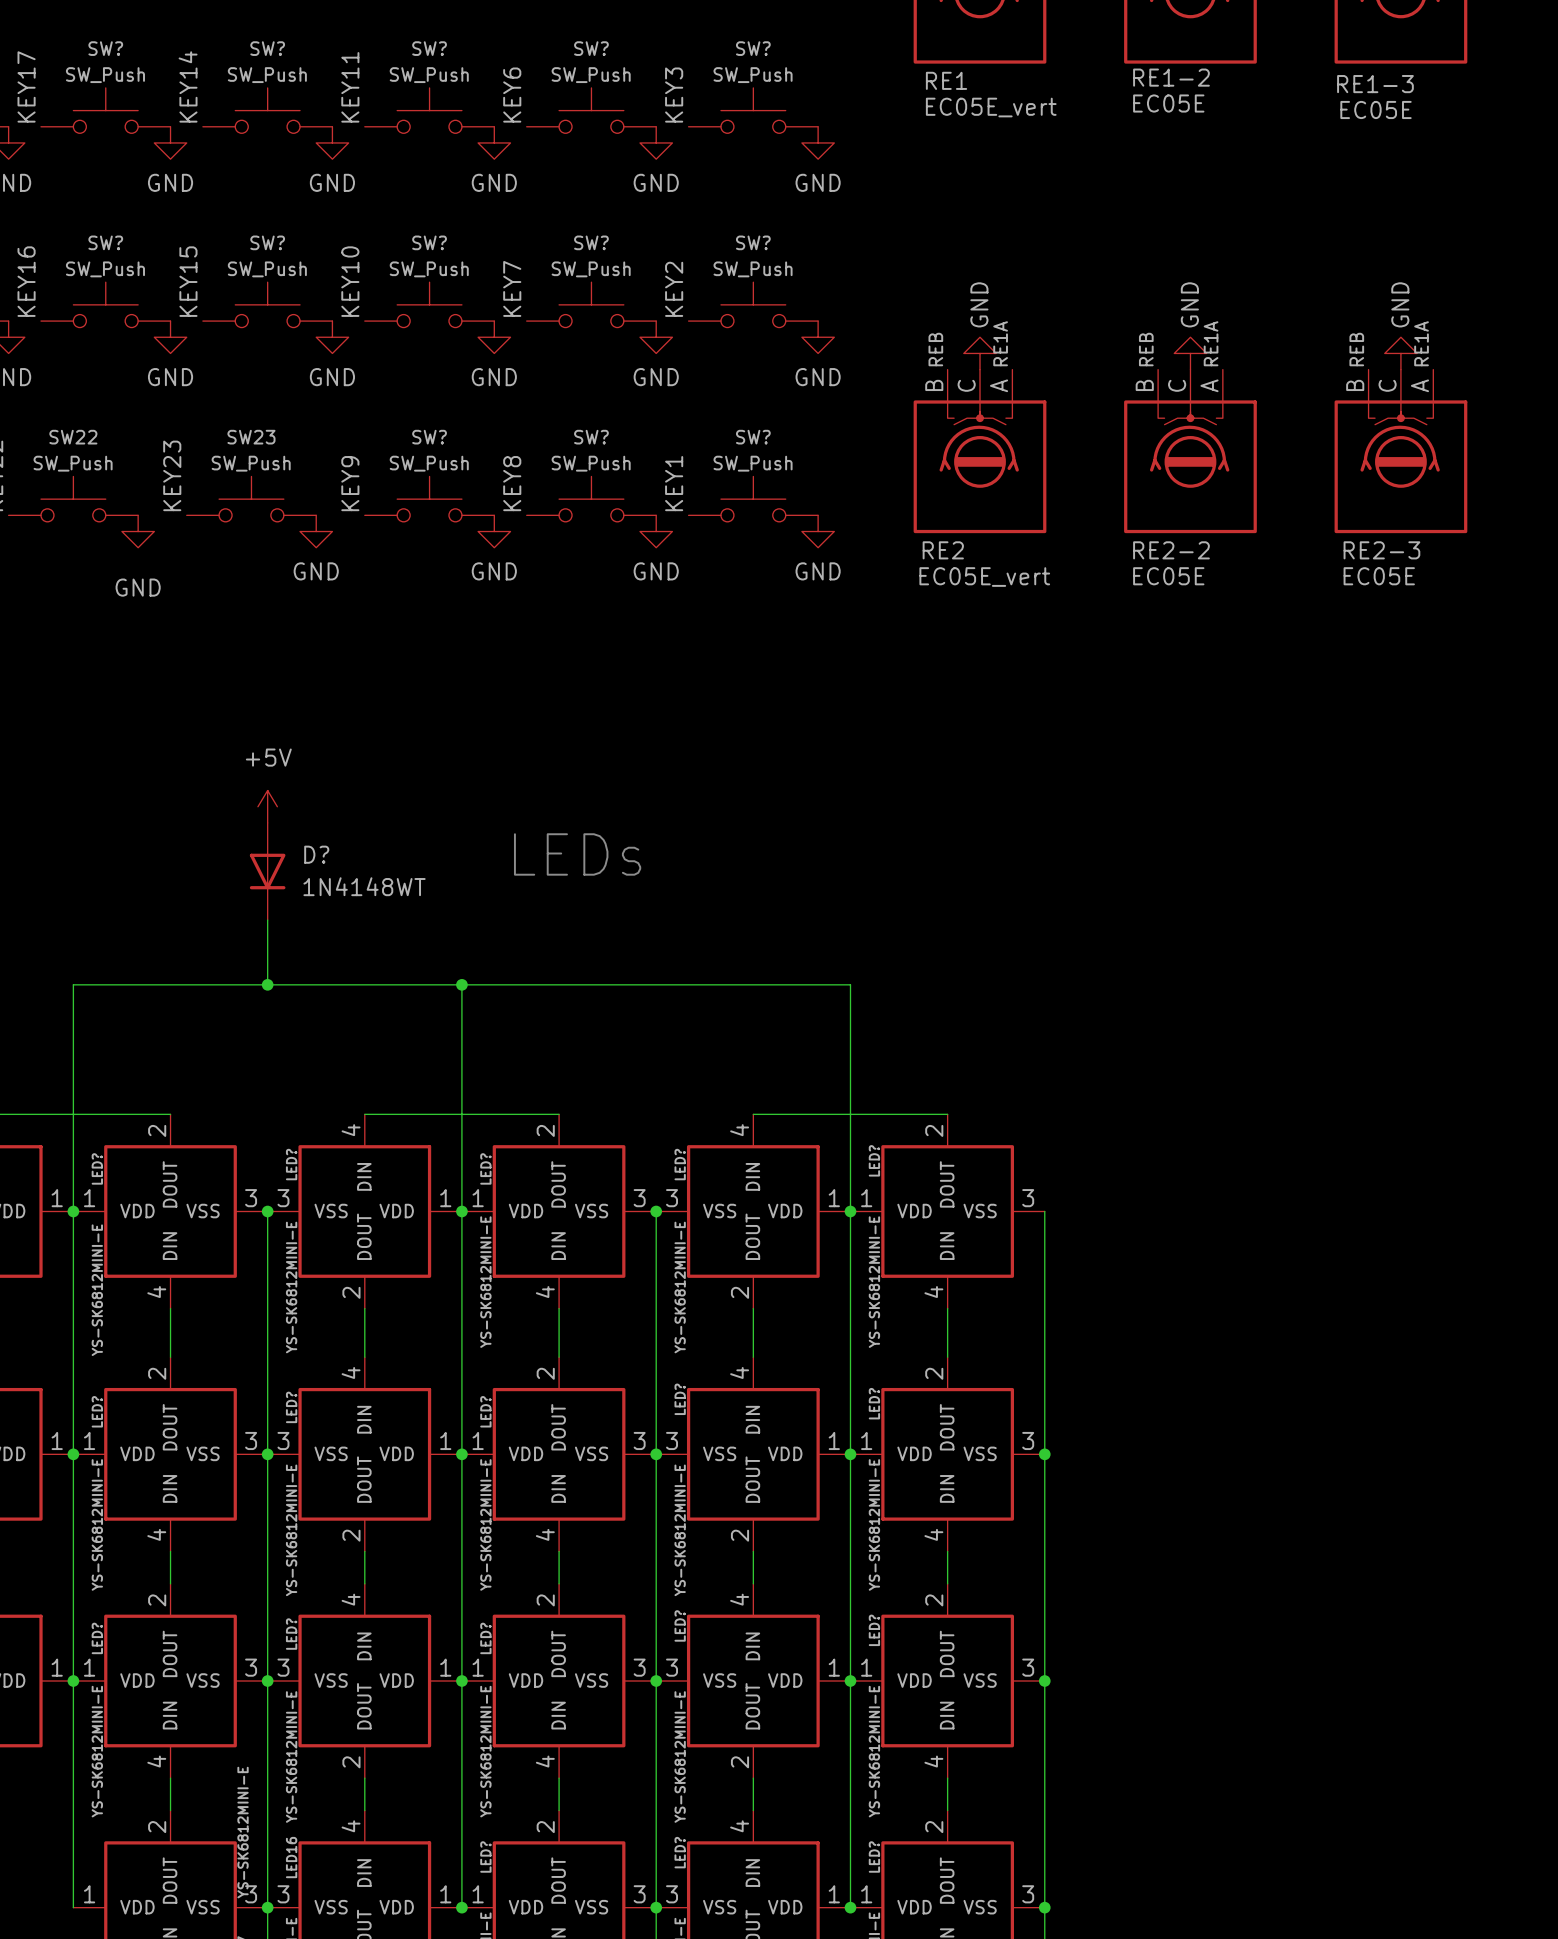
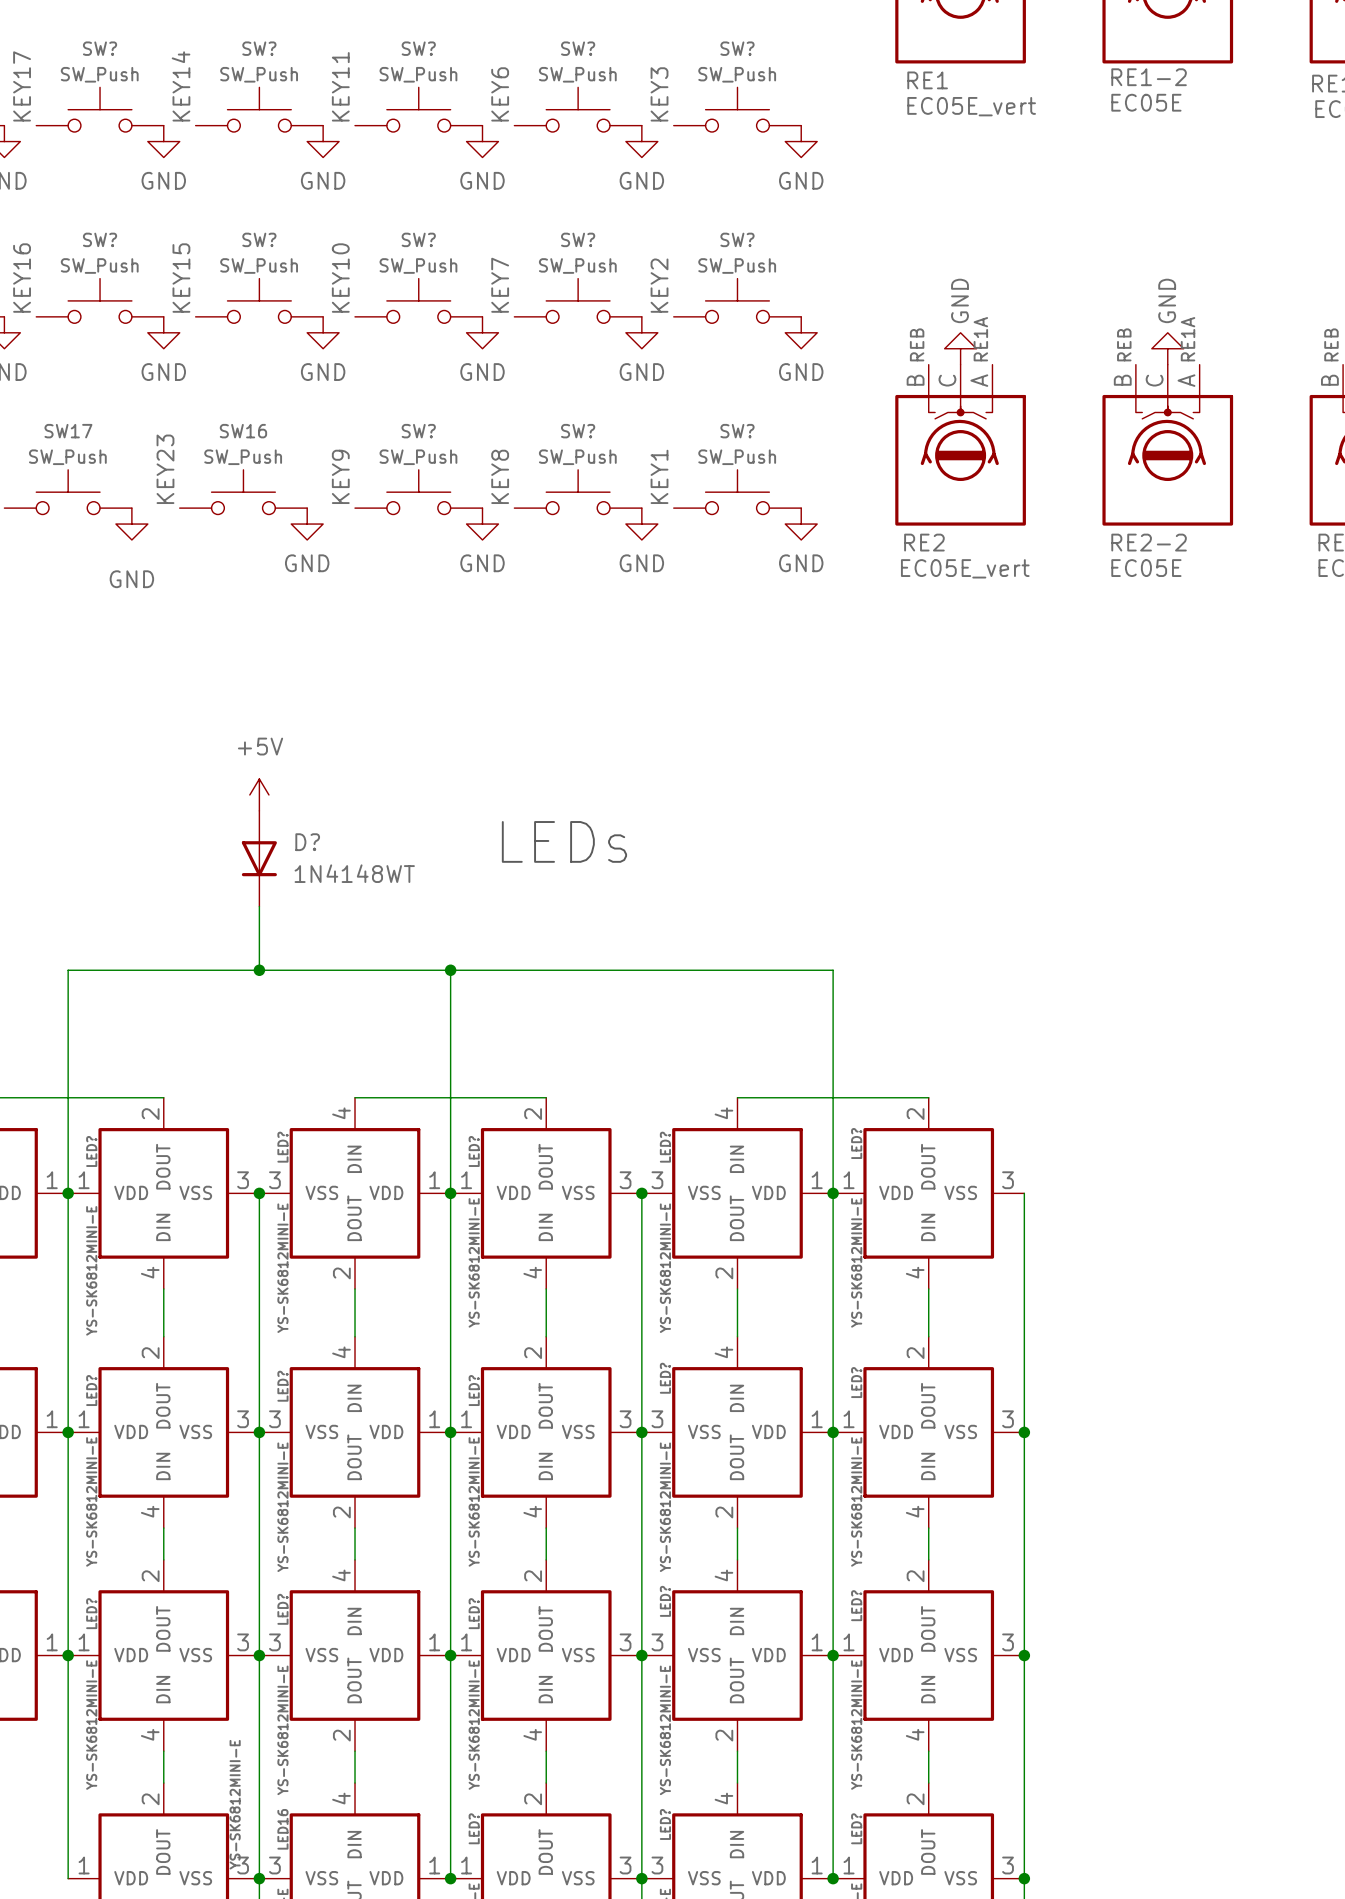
SW22 name: SW22 (73, 437) -> SW17 (68, 431)
SW23 name: SW23 (251, 437) -> SW16 (243, 431)

